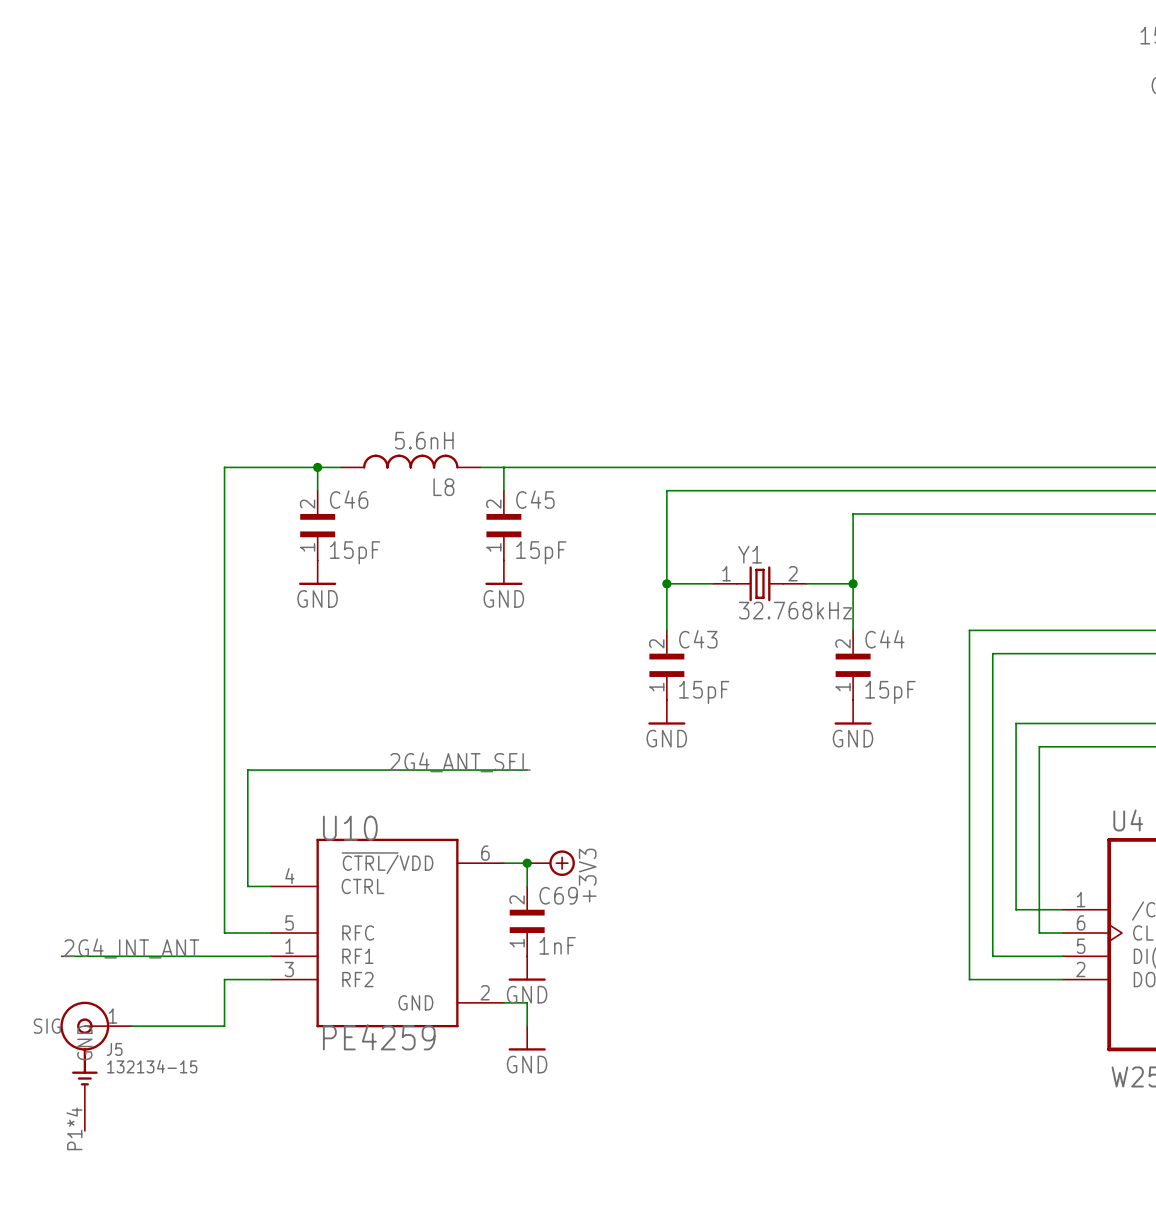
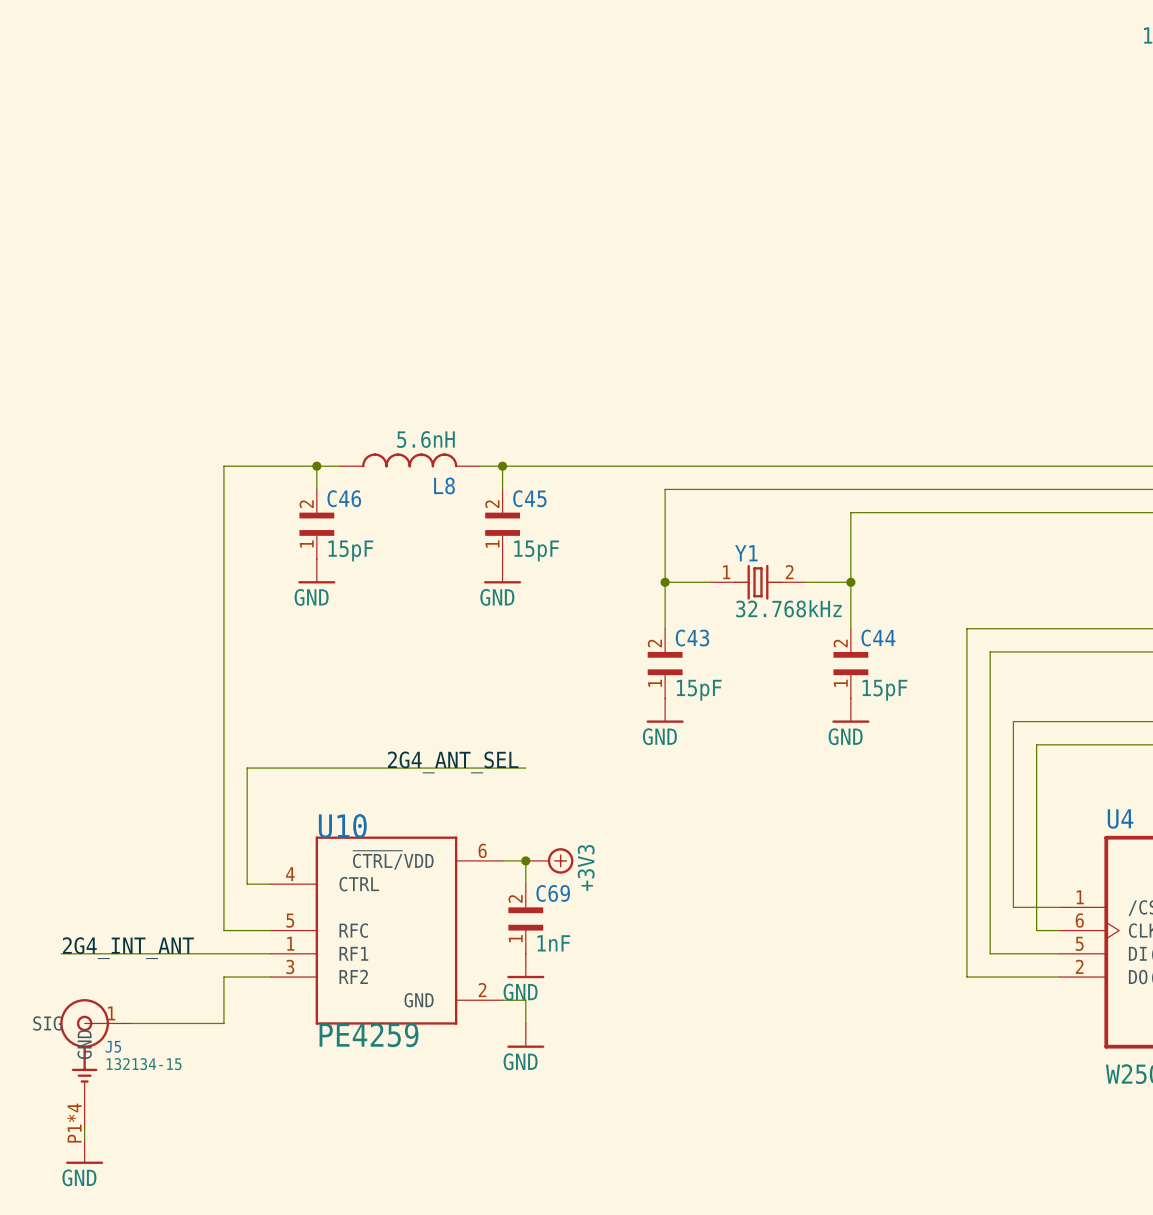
junction: none -> (502, 466)
wire: none -> (84, 1127) (84, 1139)
power symbol: none -> GND (84, 1151)

